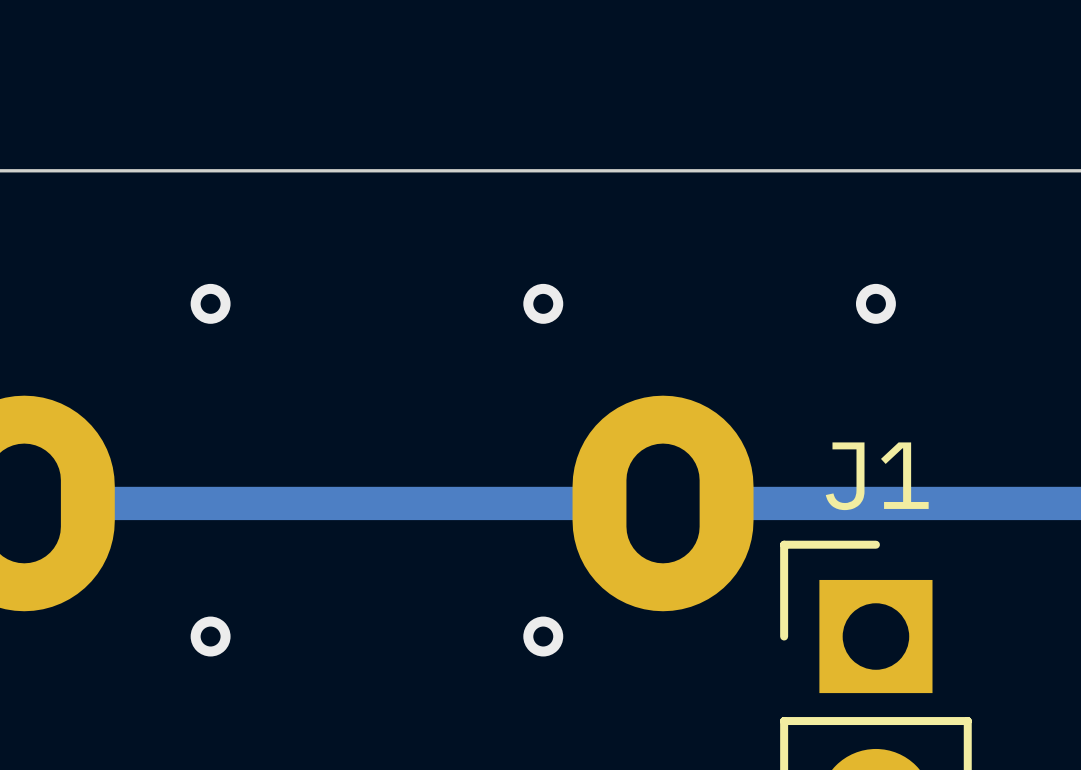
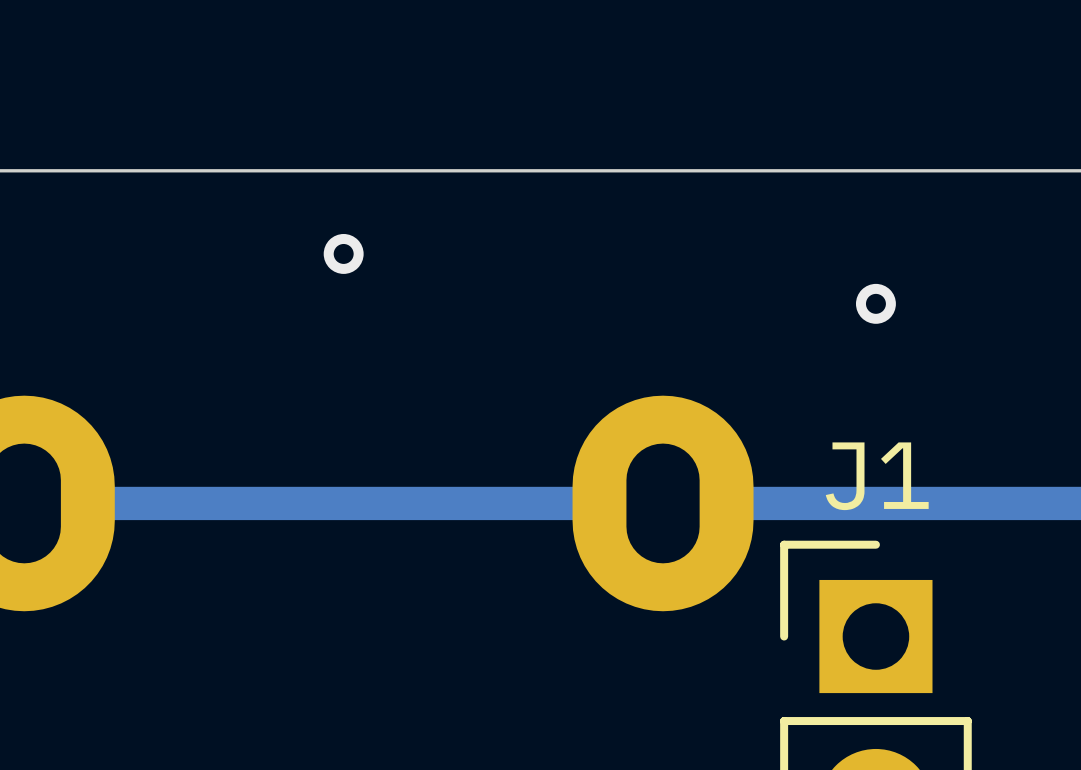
via: none -> (343, 253)
via: (210, 303) -> none
via: (543, 303) -> none
via: (210, 636) -> none
via: (543, 636) -> none

